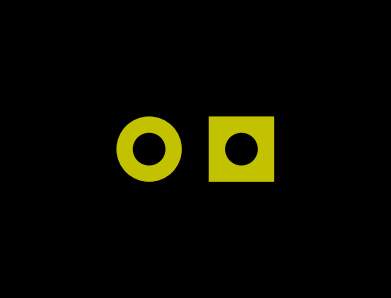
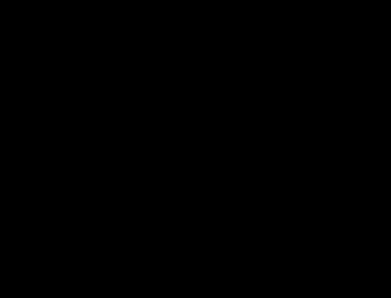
part: (195, 149) -> none

